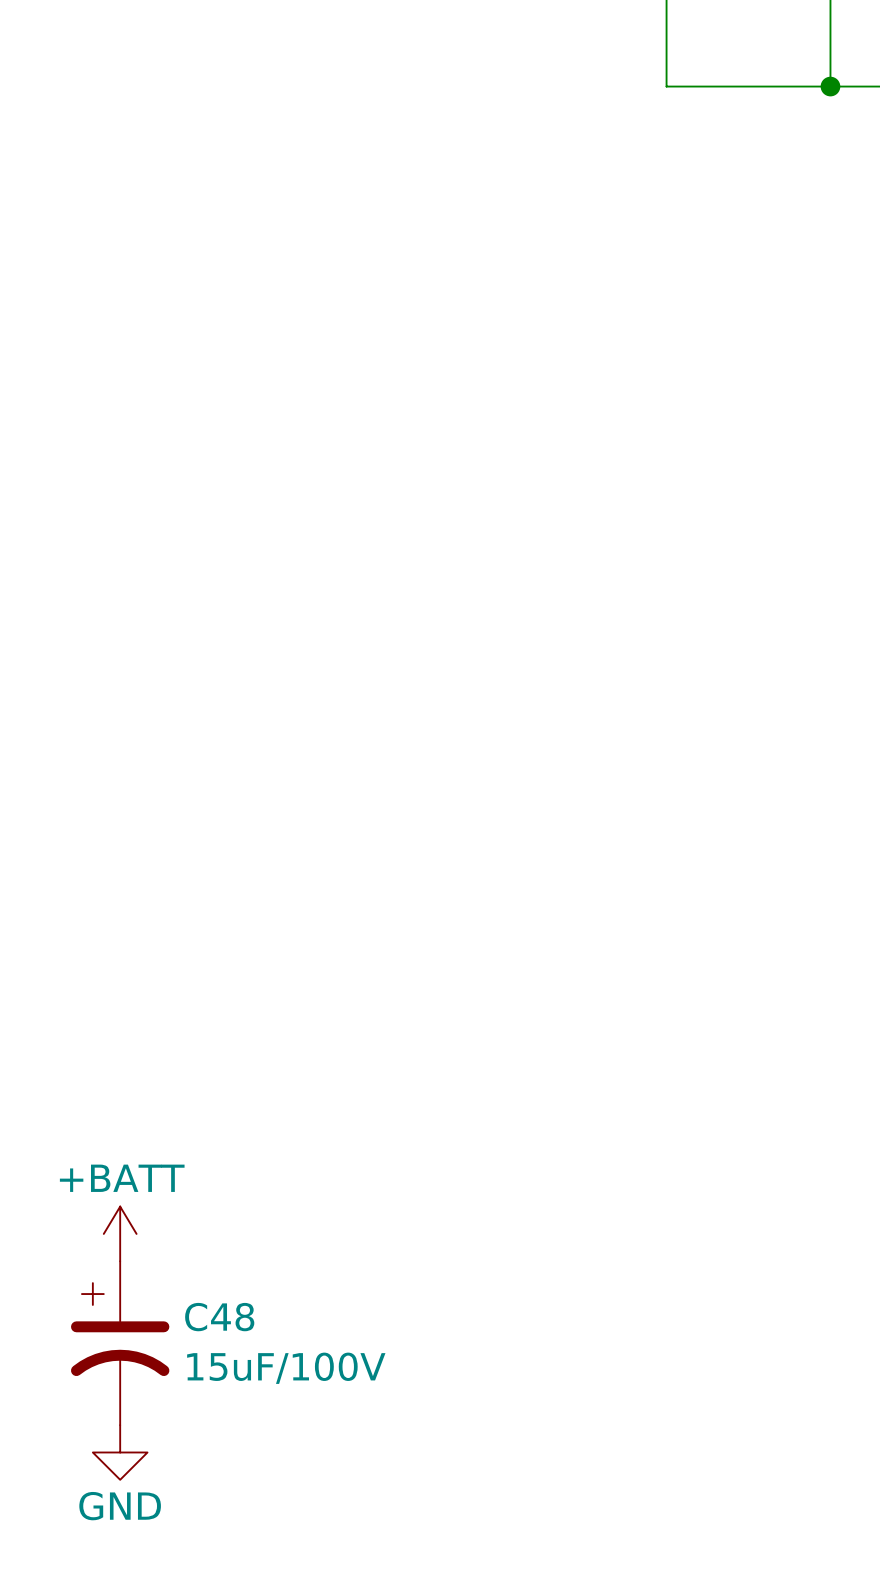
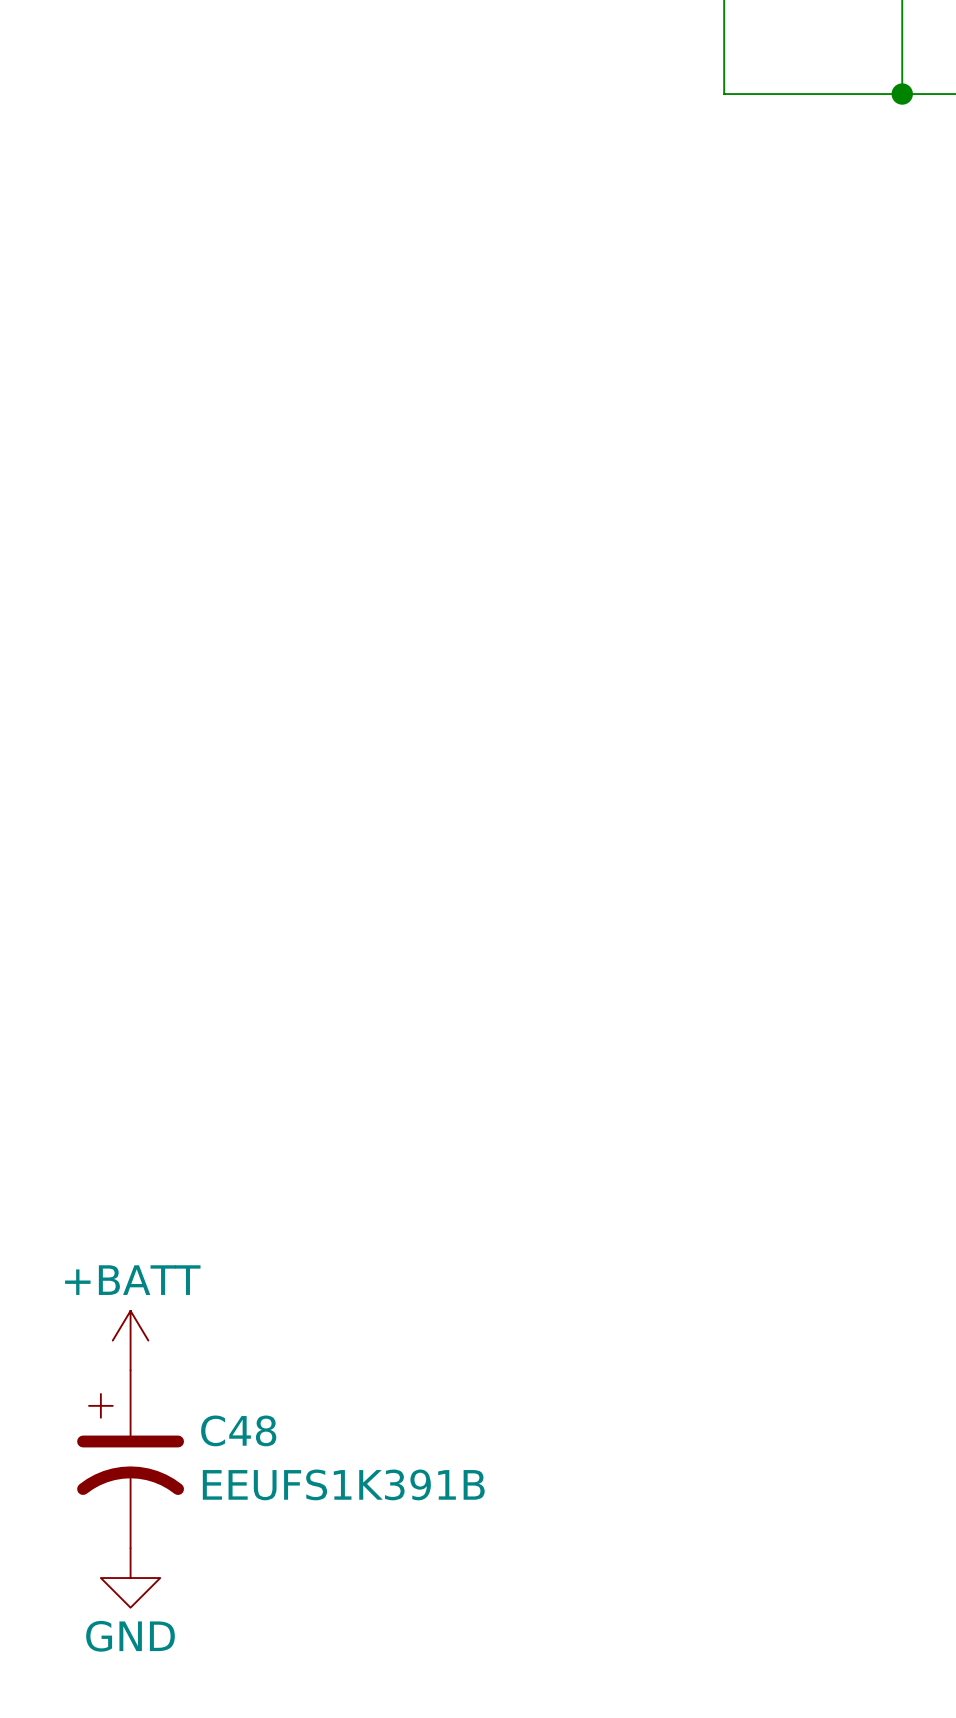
C48 value: 15uF/100V (286, 1368) -> EEUFS1K391B (343, 1484)

